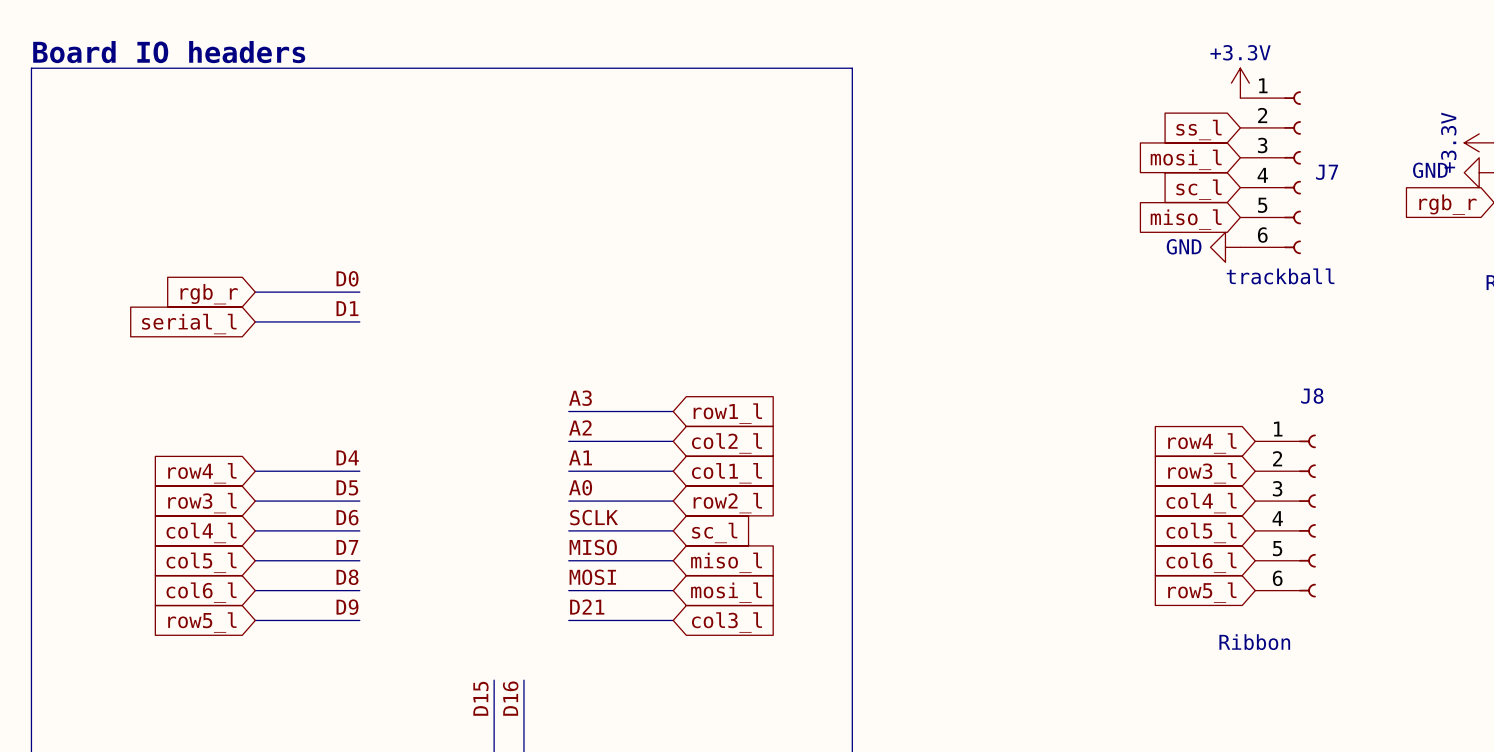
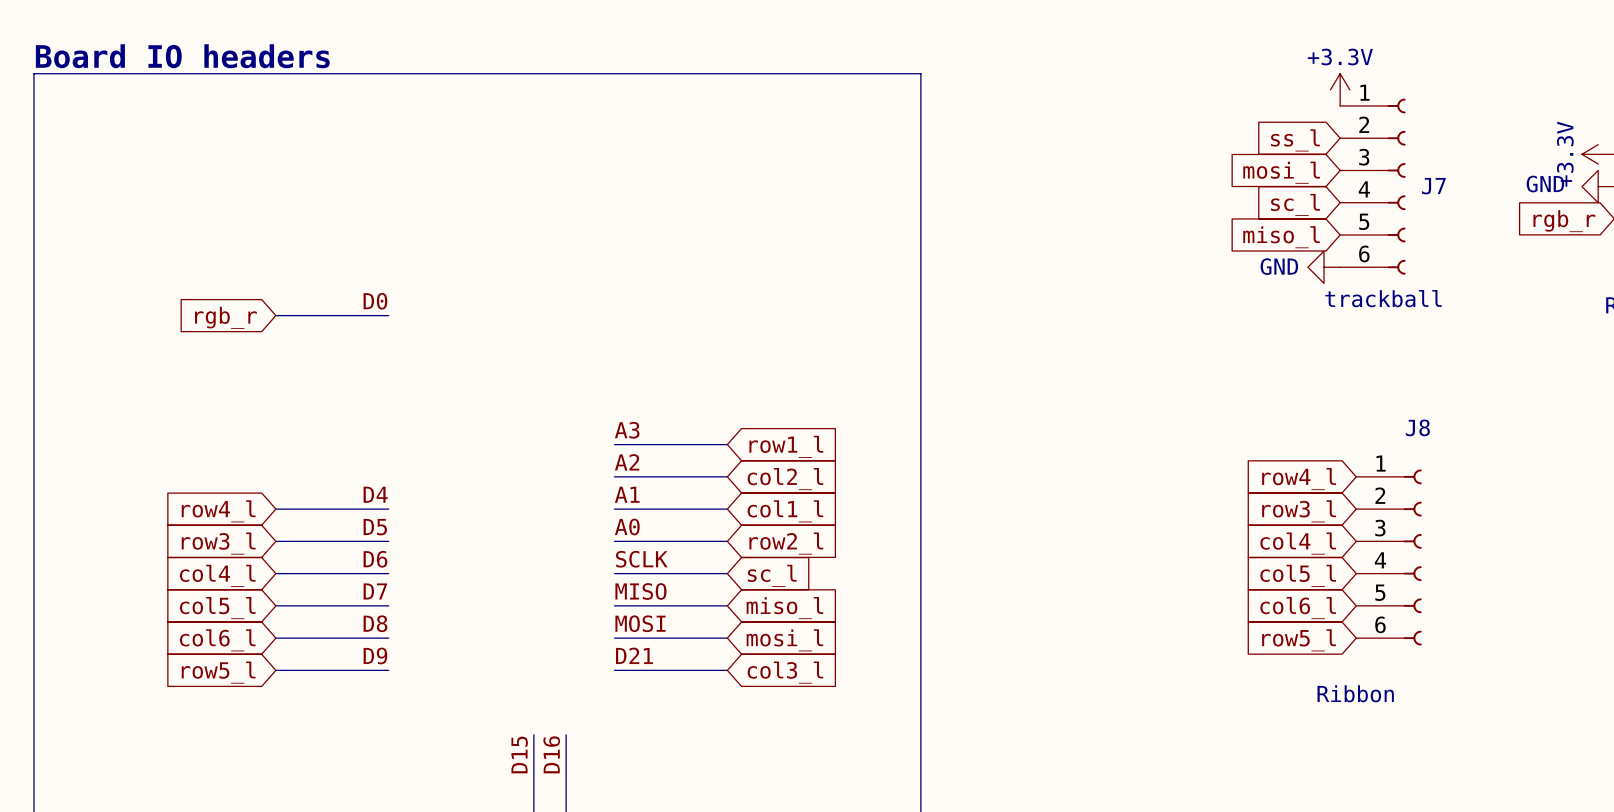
label: D1 (347, 308) -> none
wire: (255, 321) (359, 321) -> none
global label: serial_l (189, 324) -> none

